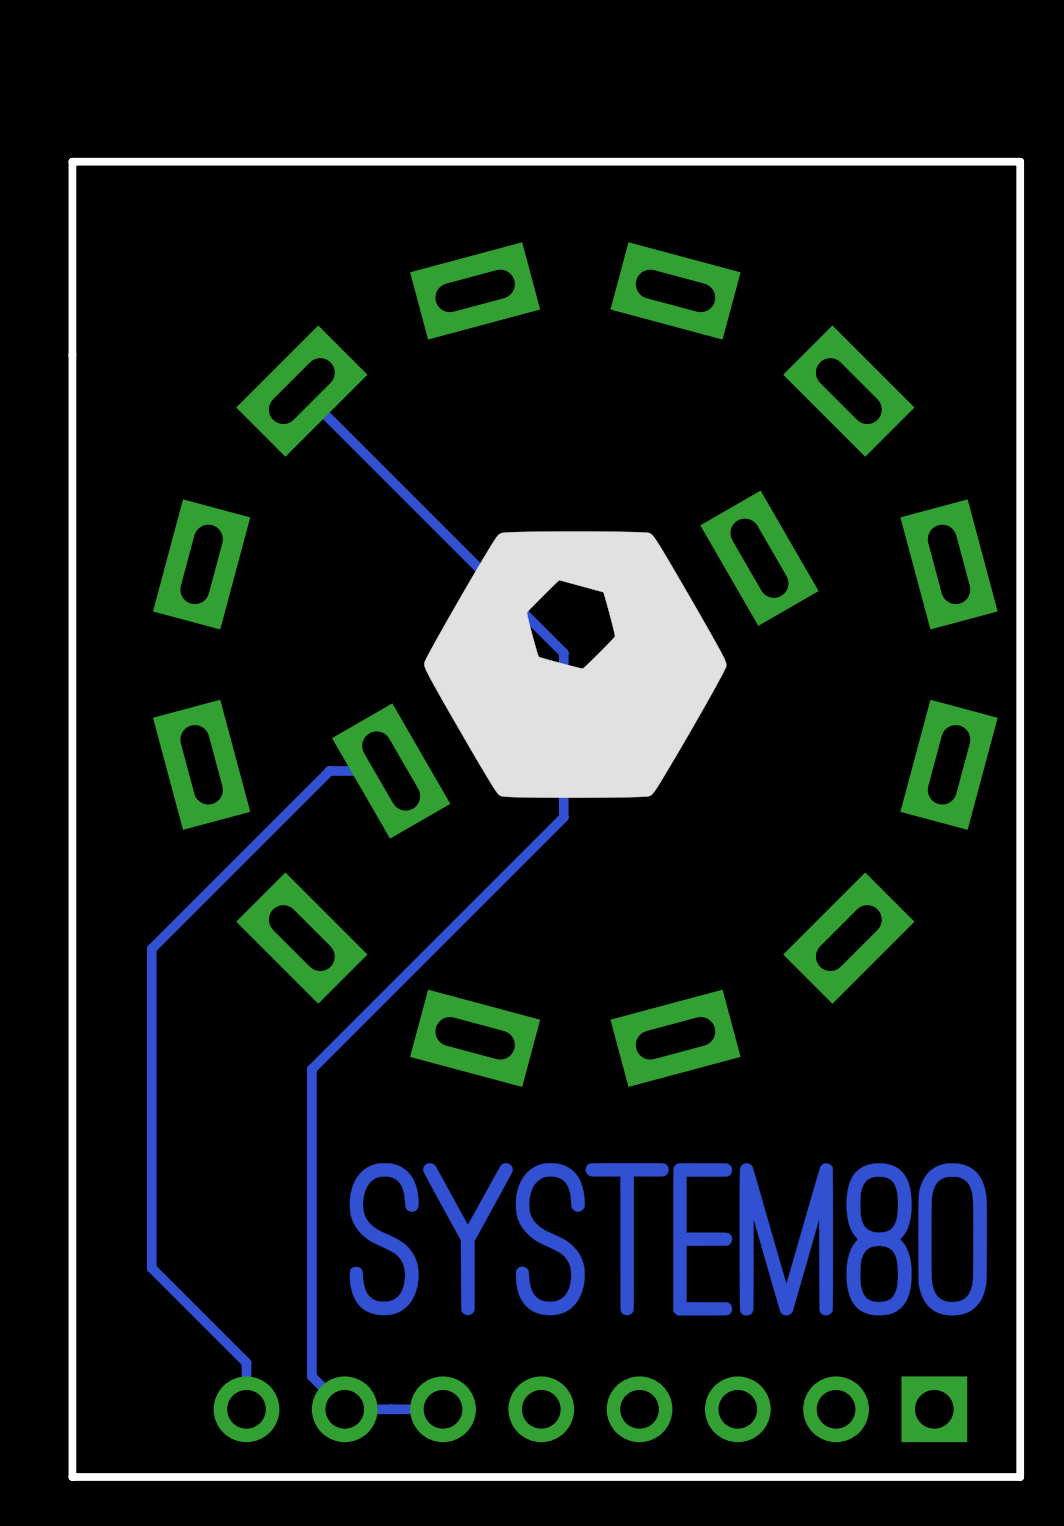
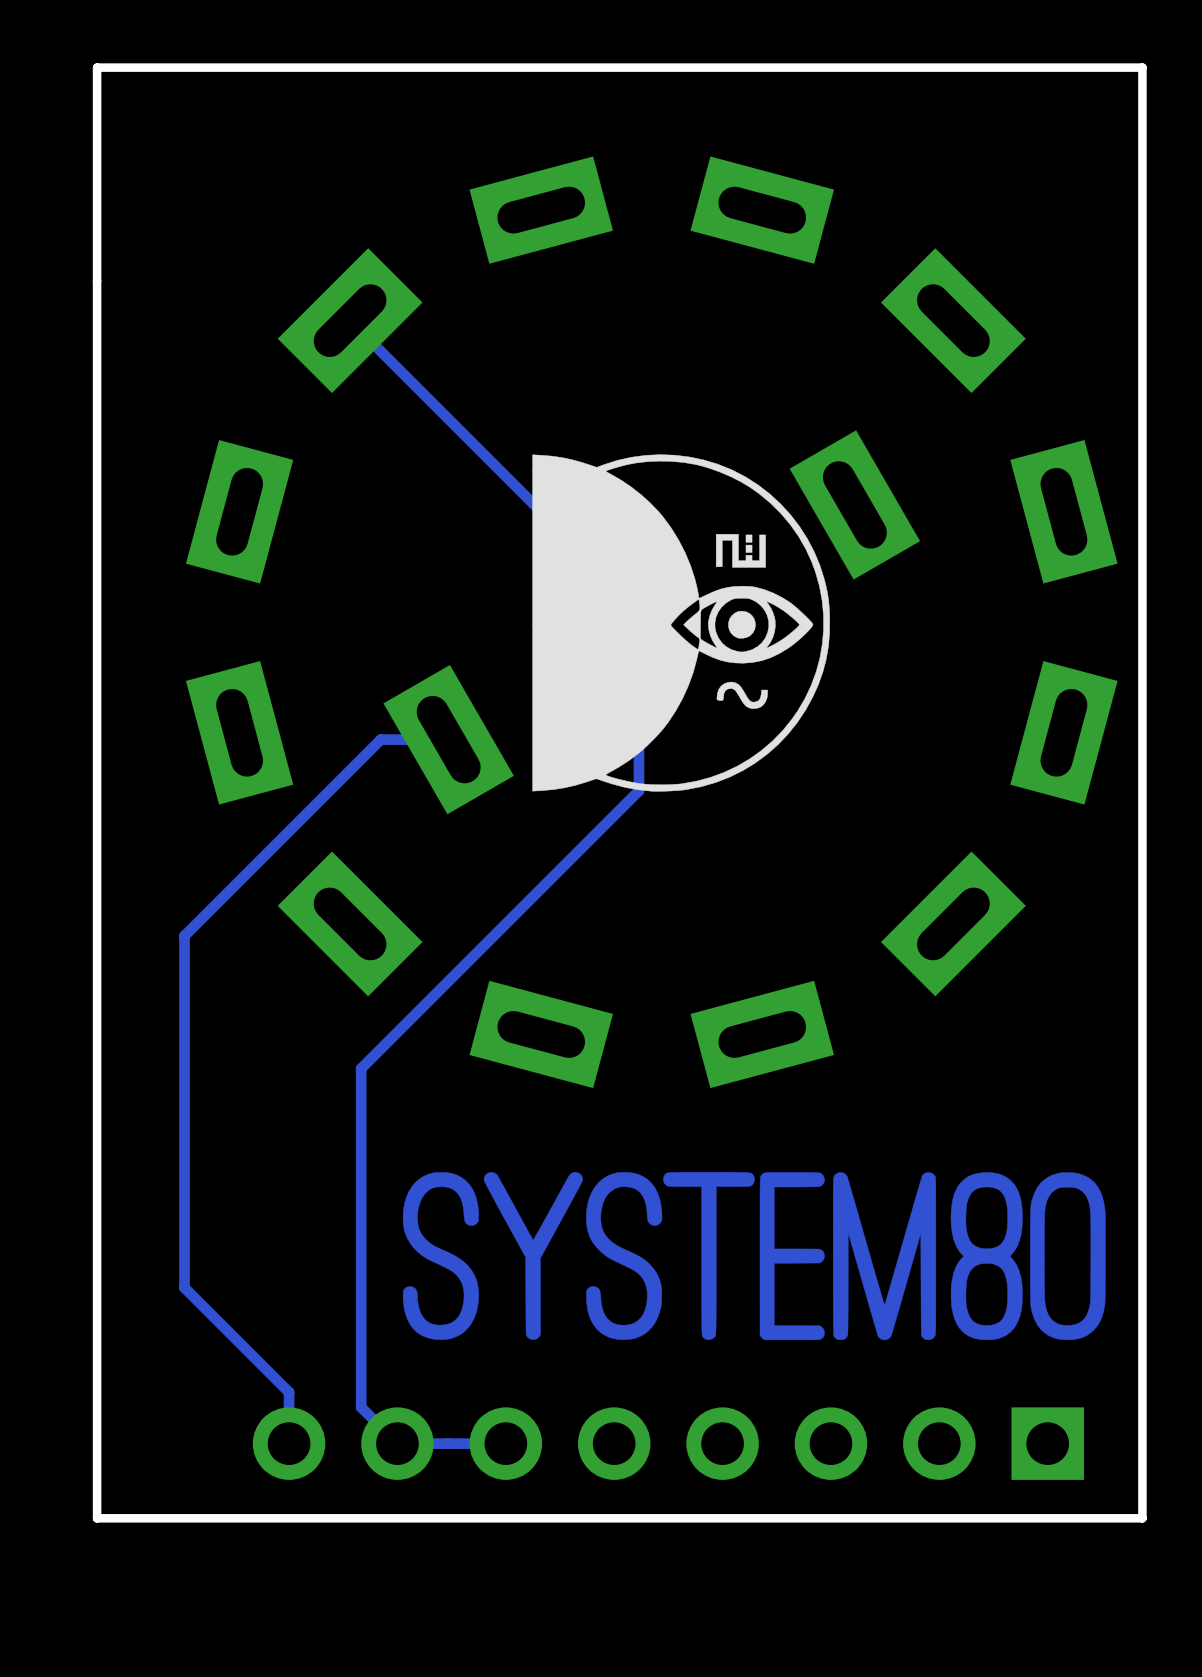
drawing shape: [424, 531, 727, 798] -> [532, 454, 830, 792]

